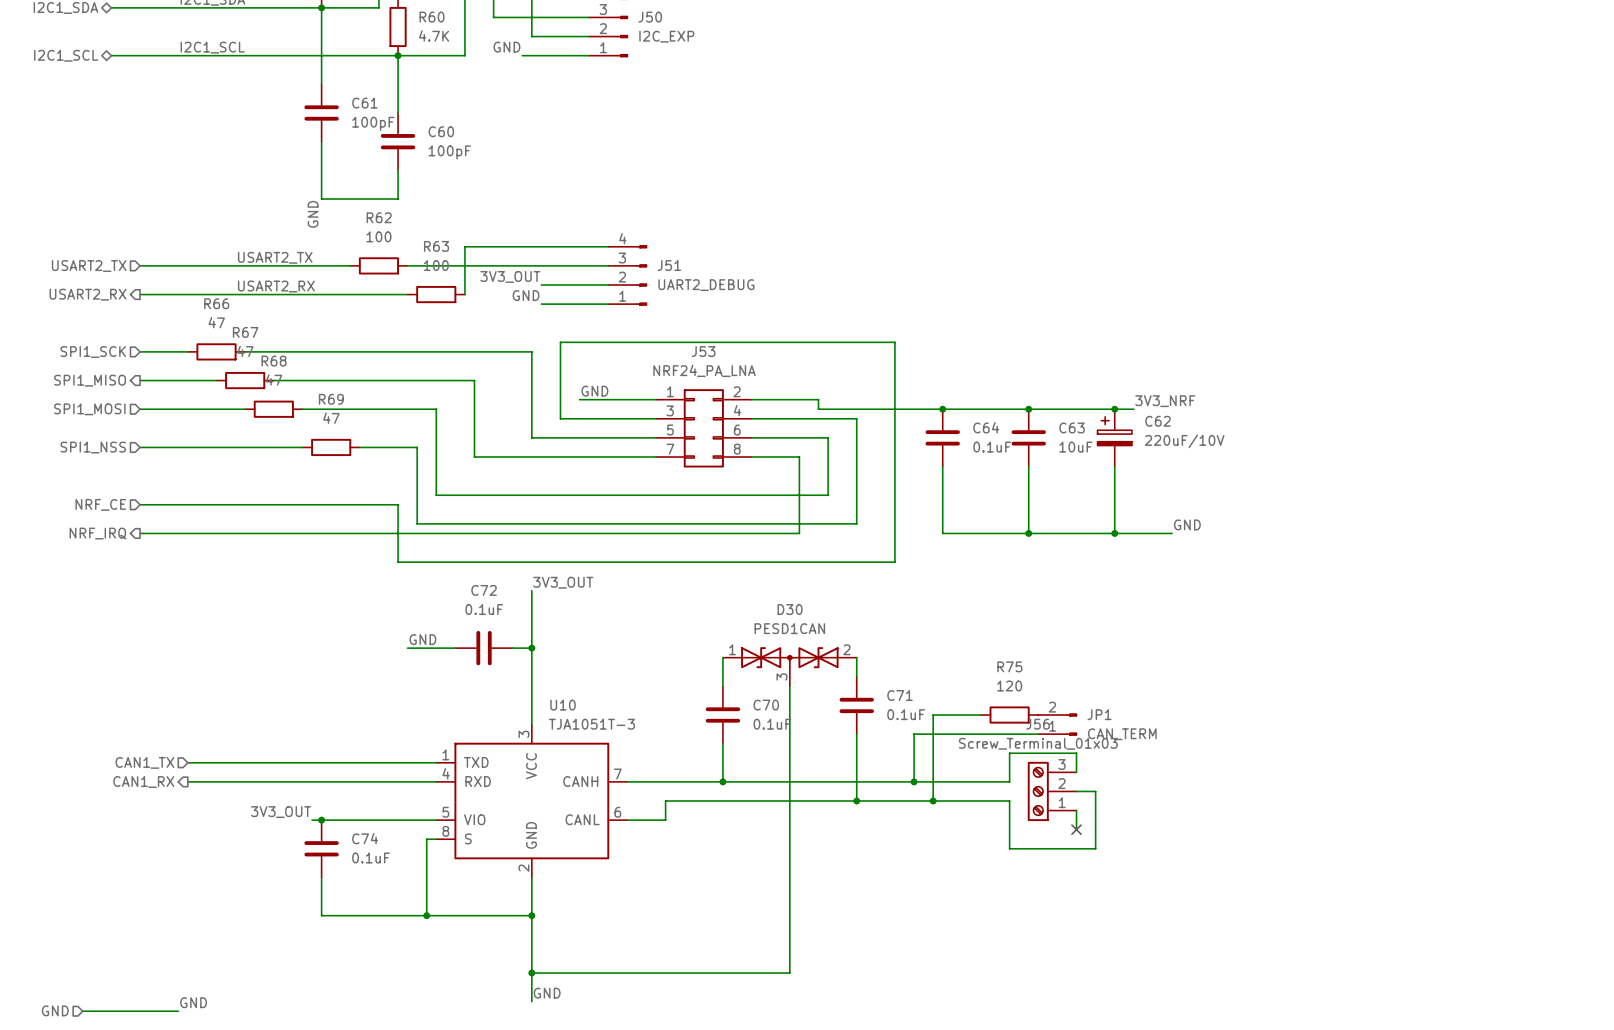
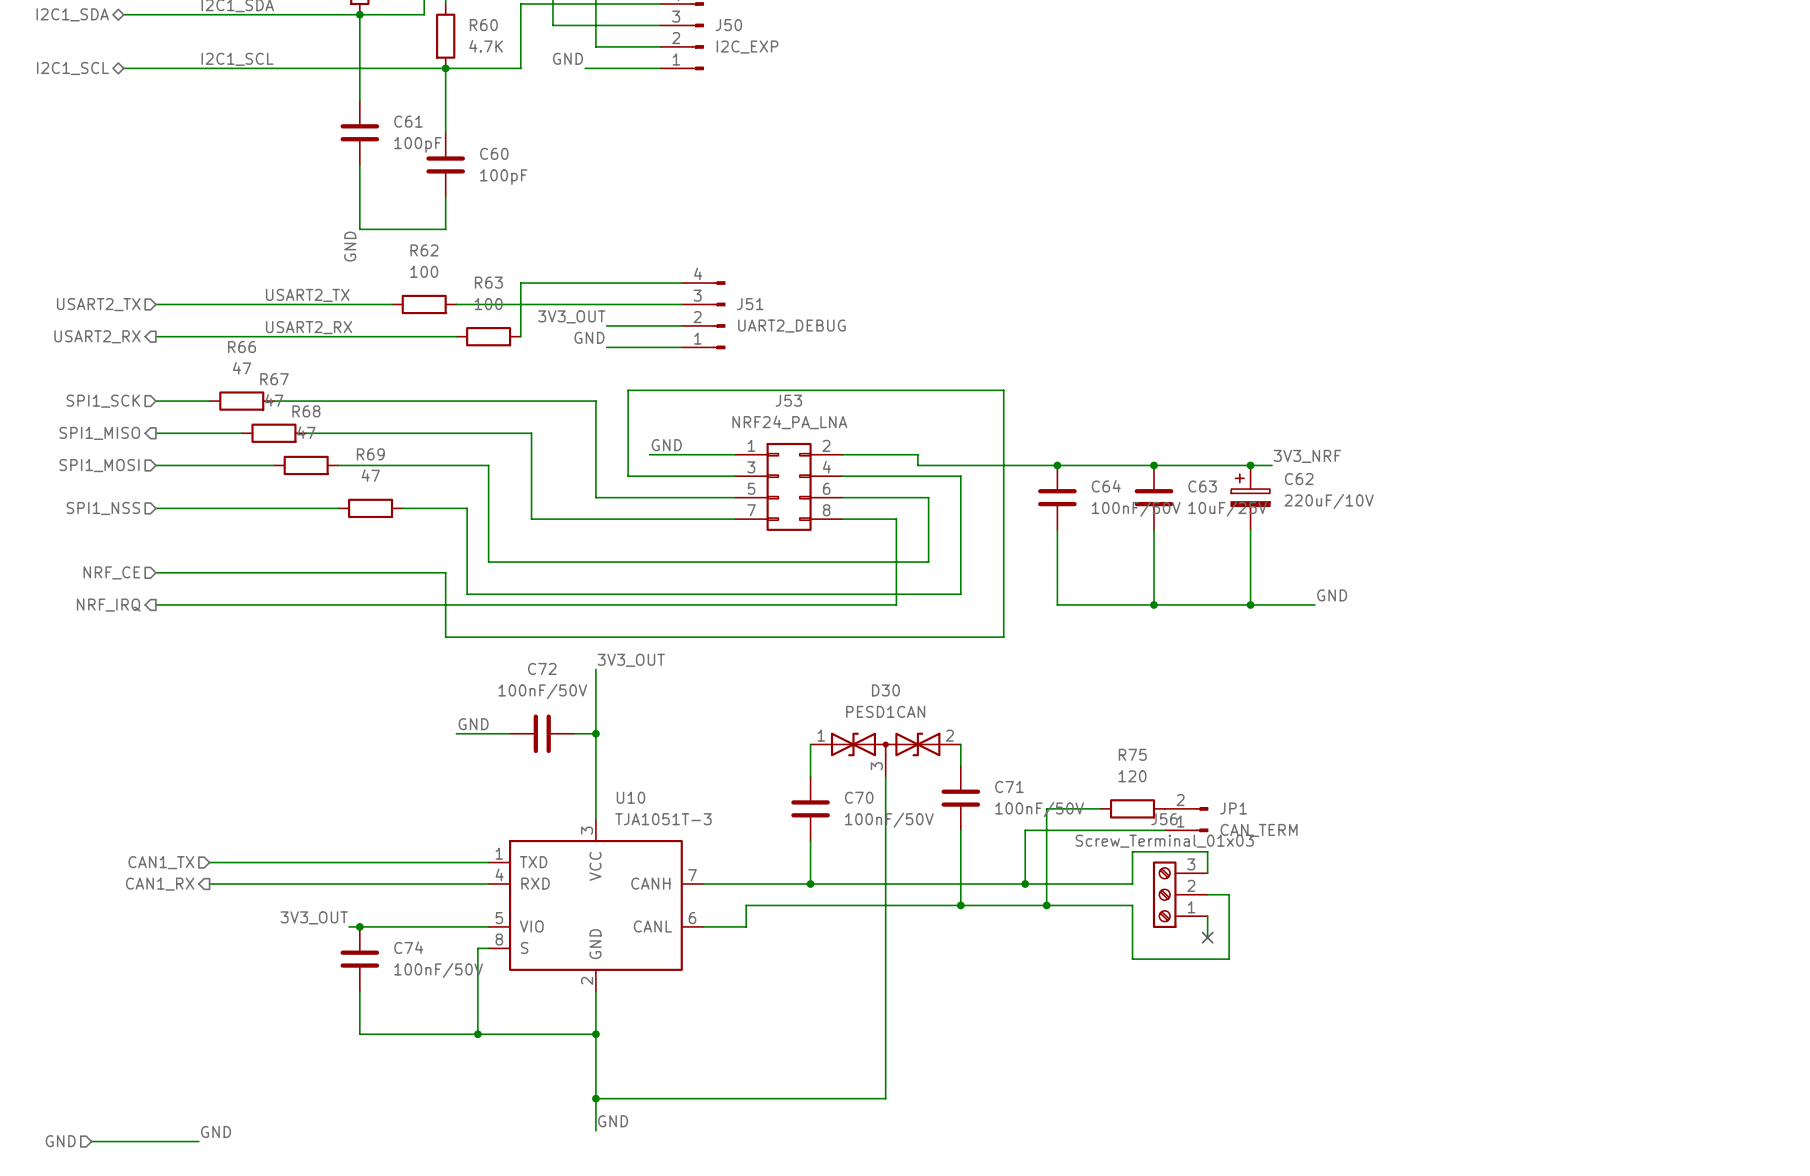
C64 value: 0.1uF (992, 447) -> 100nF/50V (1136, 509)
C63 value: 10uF (1075, 447) -> 10uF/25V (1227, 509)
C72 value: 0.1uF (484, 609) -> 100nF/50V (542, 691)
C71 value: 0.1uF (906, 714) -> 100nF/50V (1039, 809)
C70 value: 0.1uF (772, 724) -> 100nF/50V (889, 820)
C74 value: 0.1uF (371, 857) -> 100nF/50V (438, 970)

